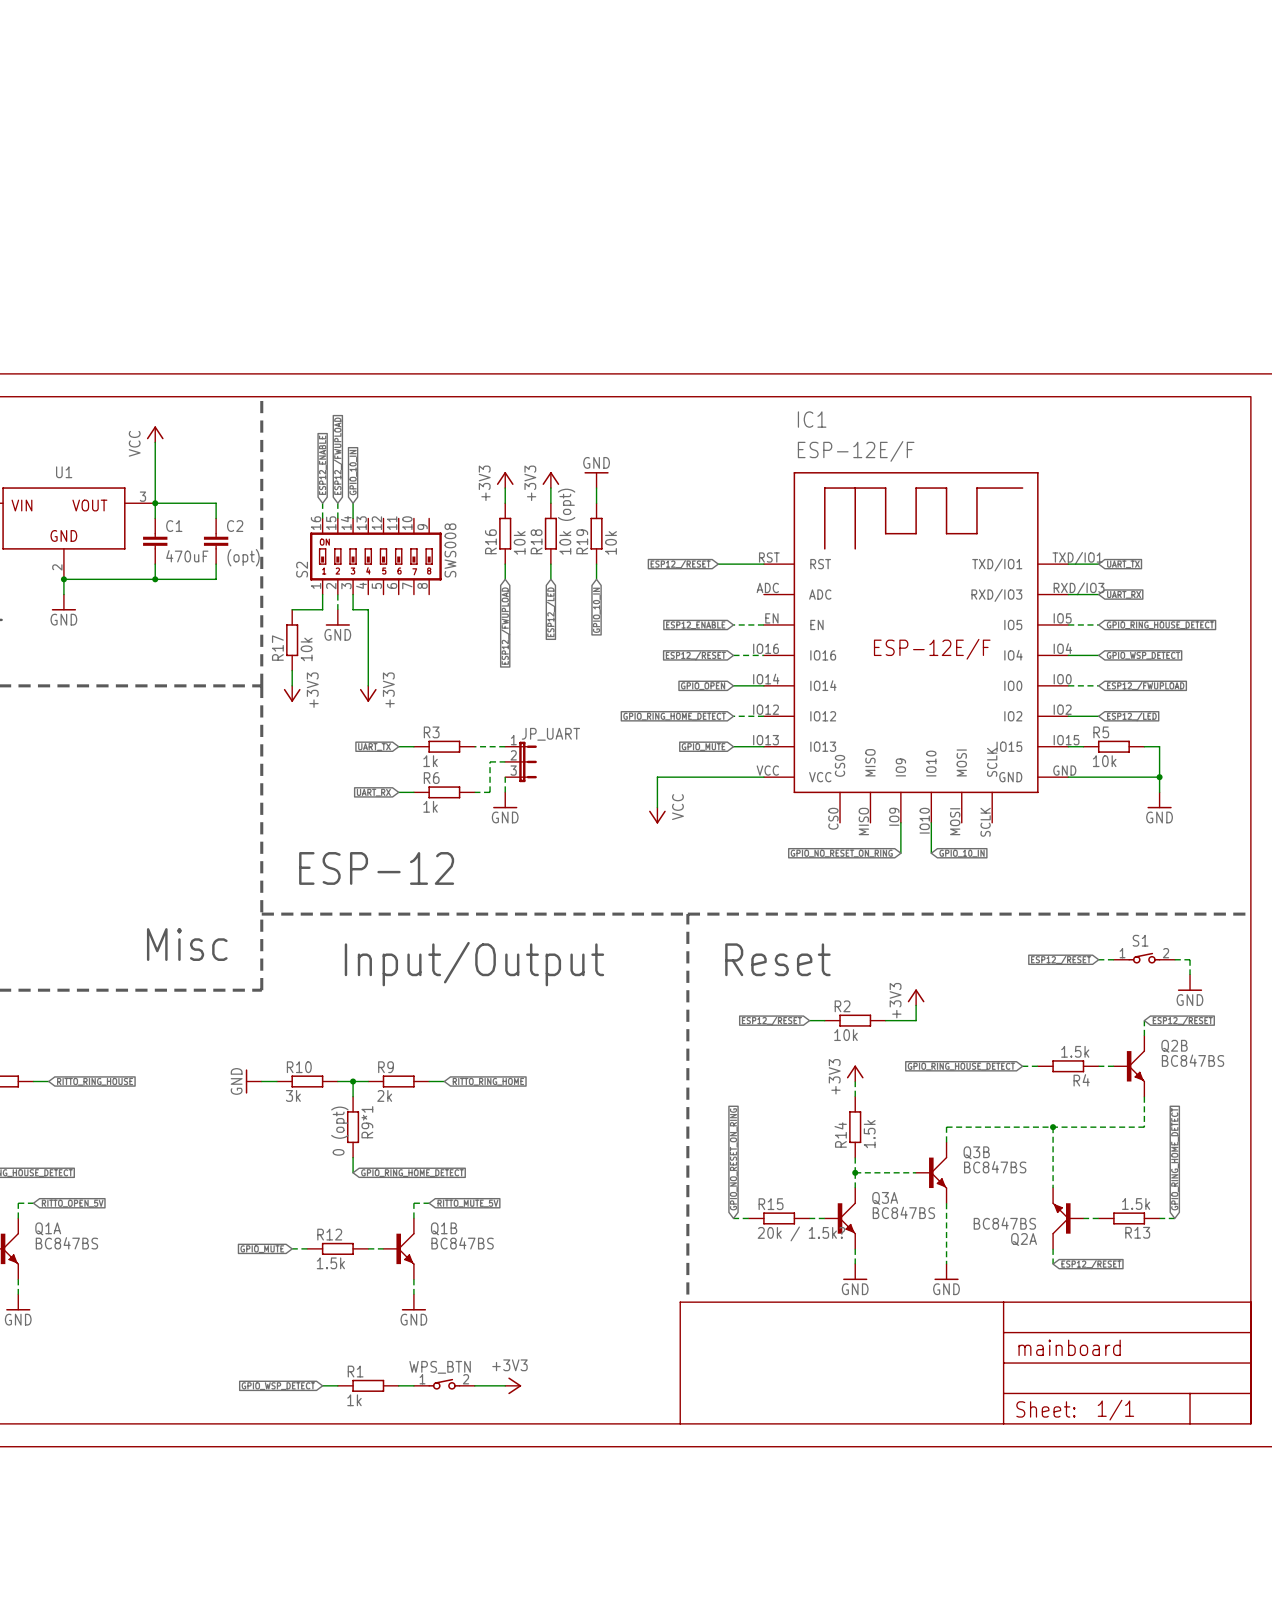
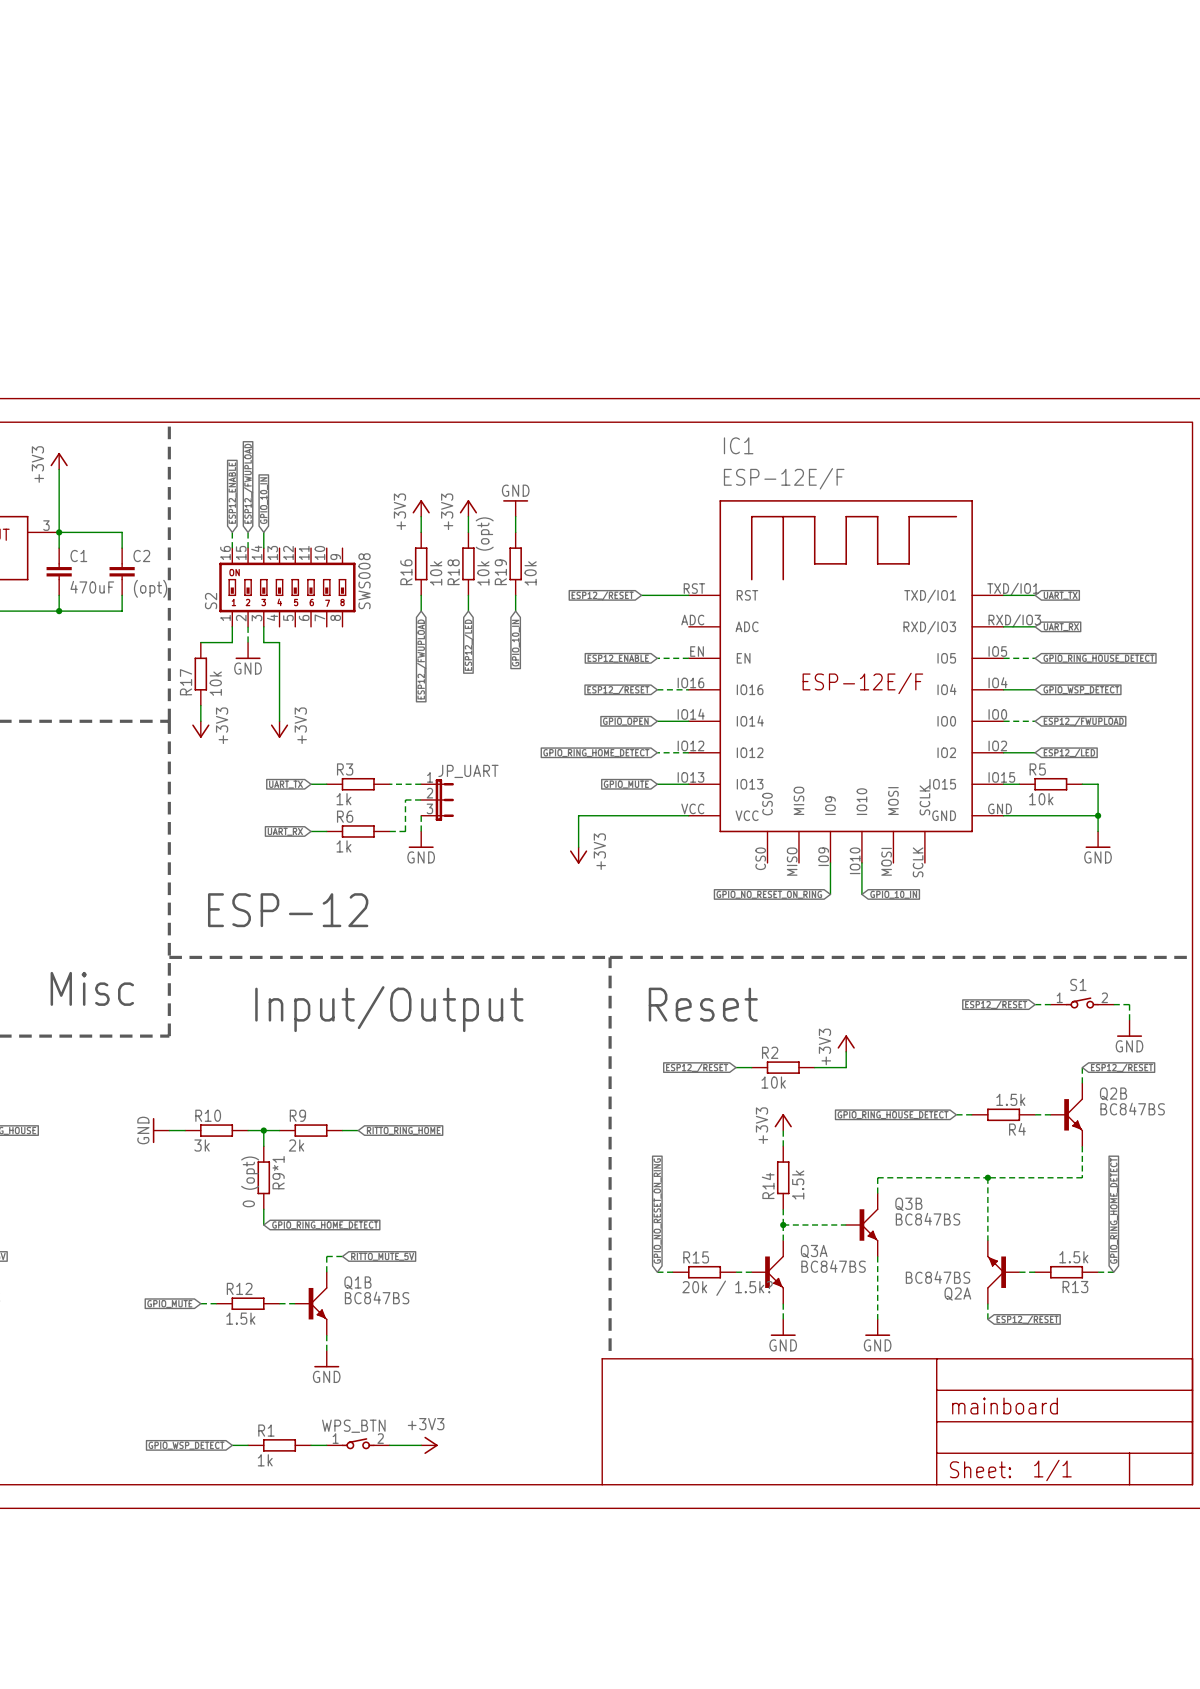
power symbol: VCC (155, 434) -> +3V3 (59, 461)
power symbol: VCC (657, 815) -> +3V3 (578, 855)

